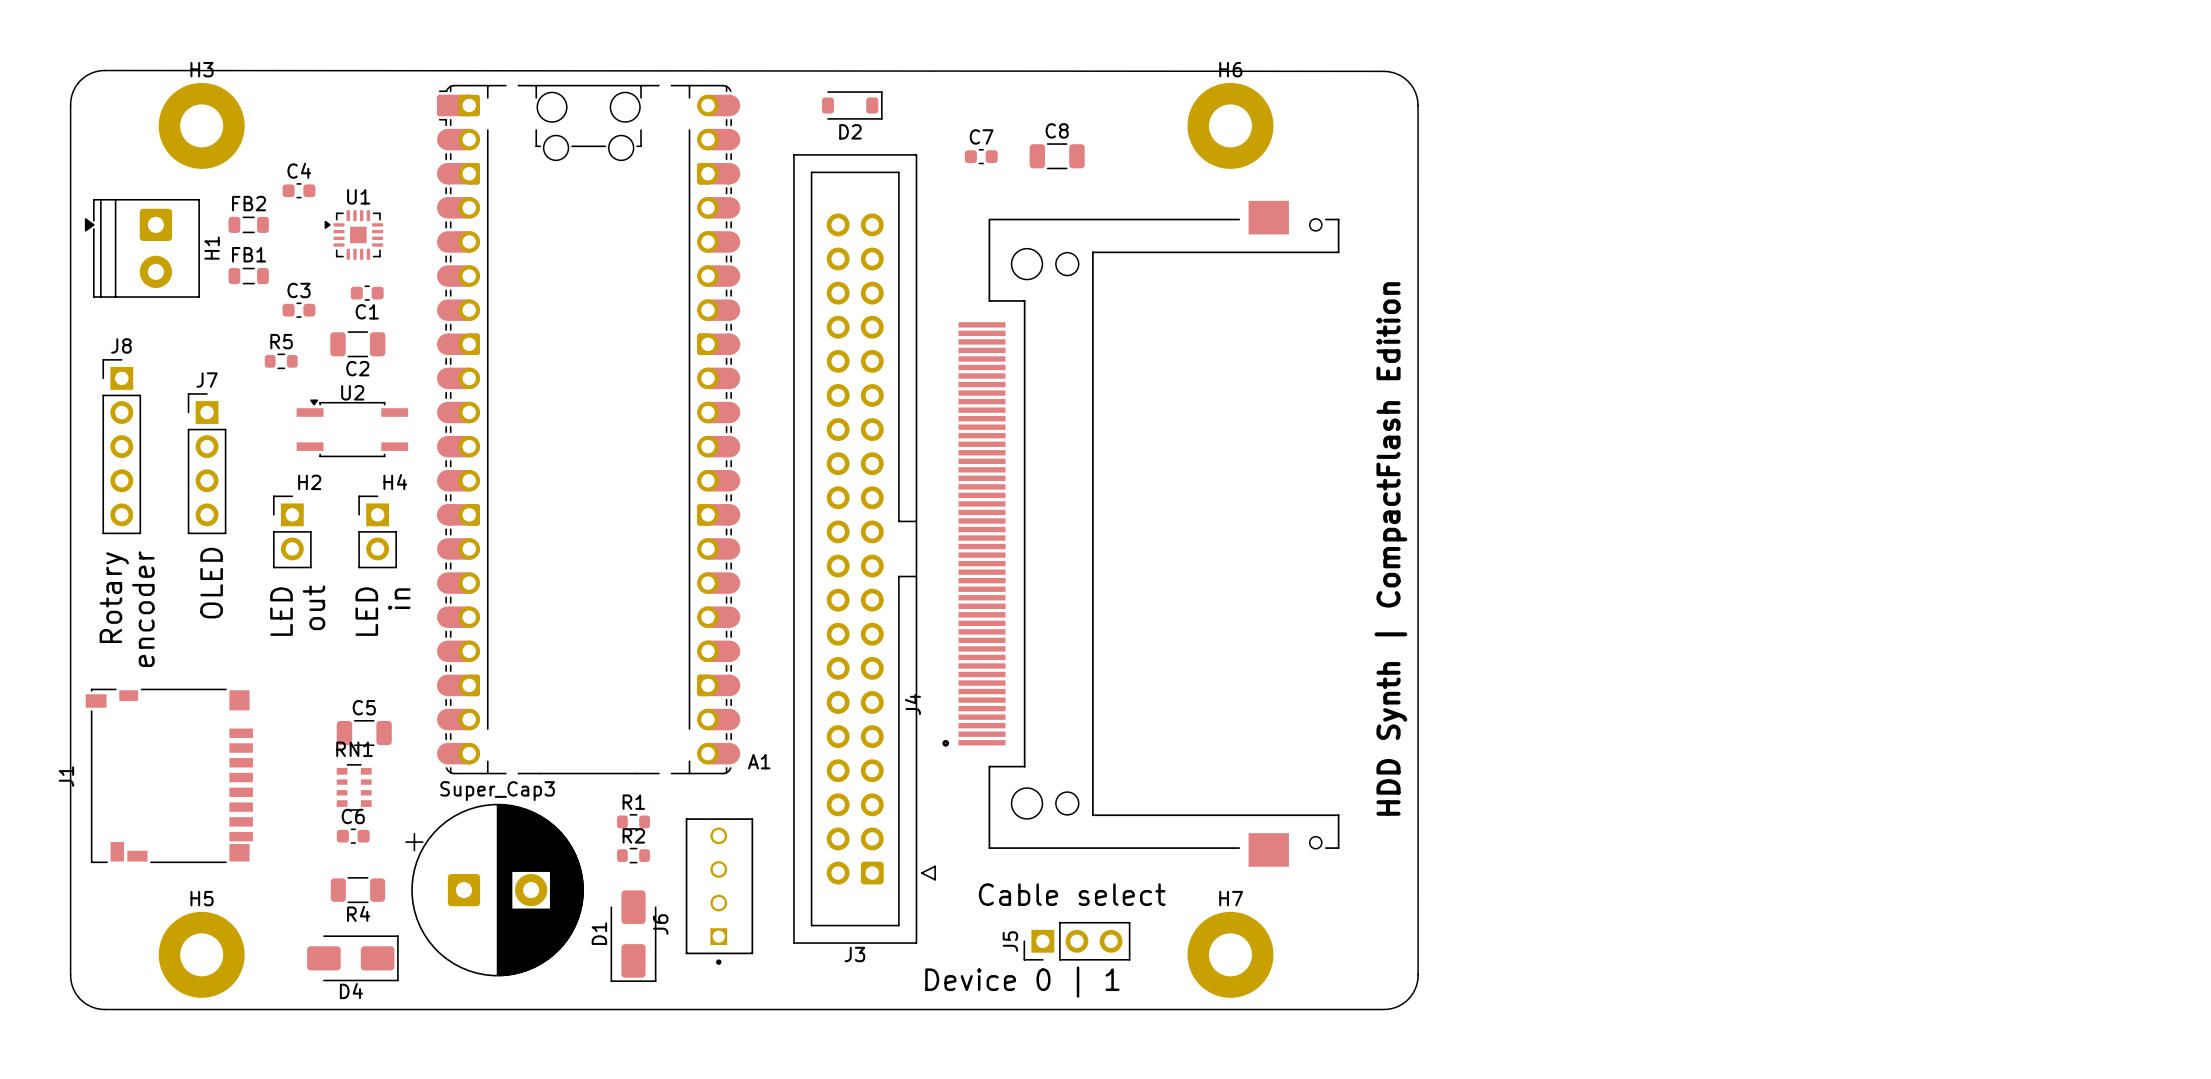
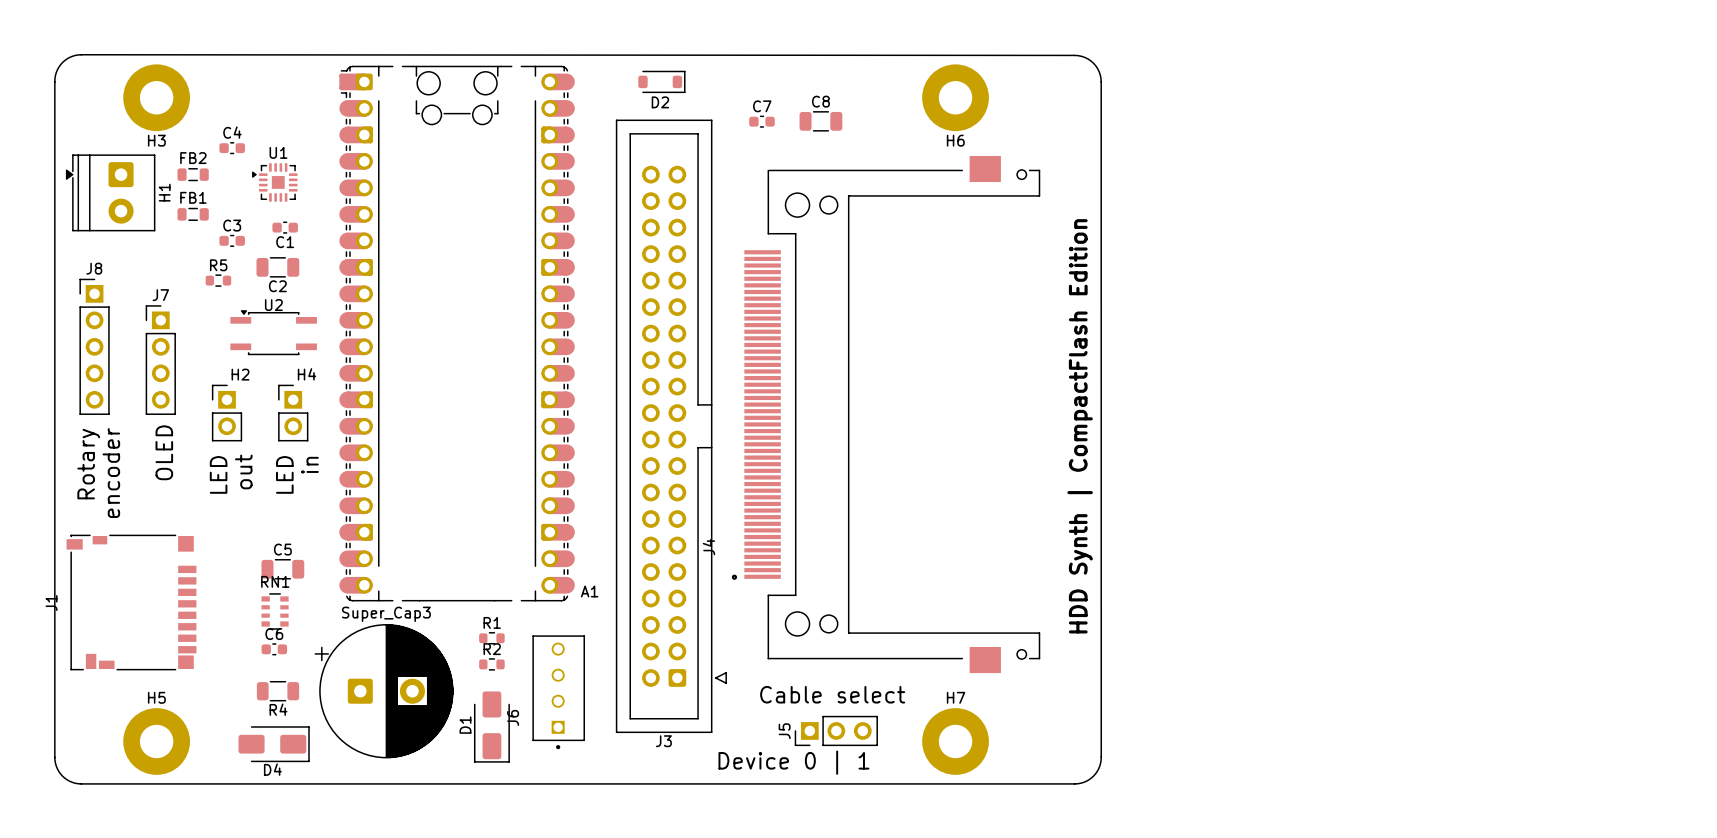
H3 name position: H3 (202, 69) -> H3 (156, 140)
H6 name position: H6 (1230, 69) -> H6 (955, 140)

